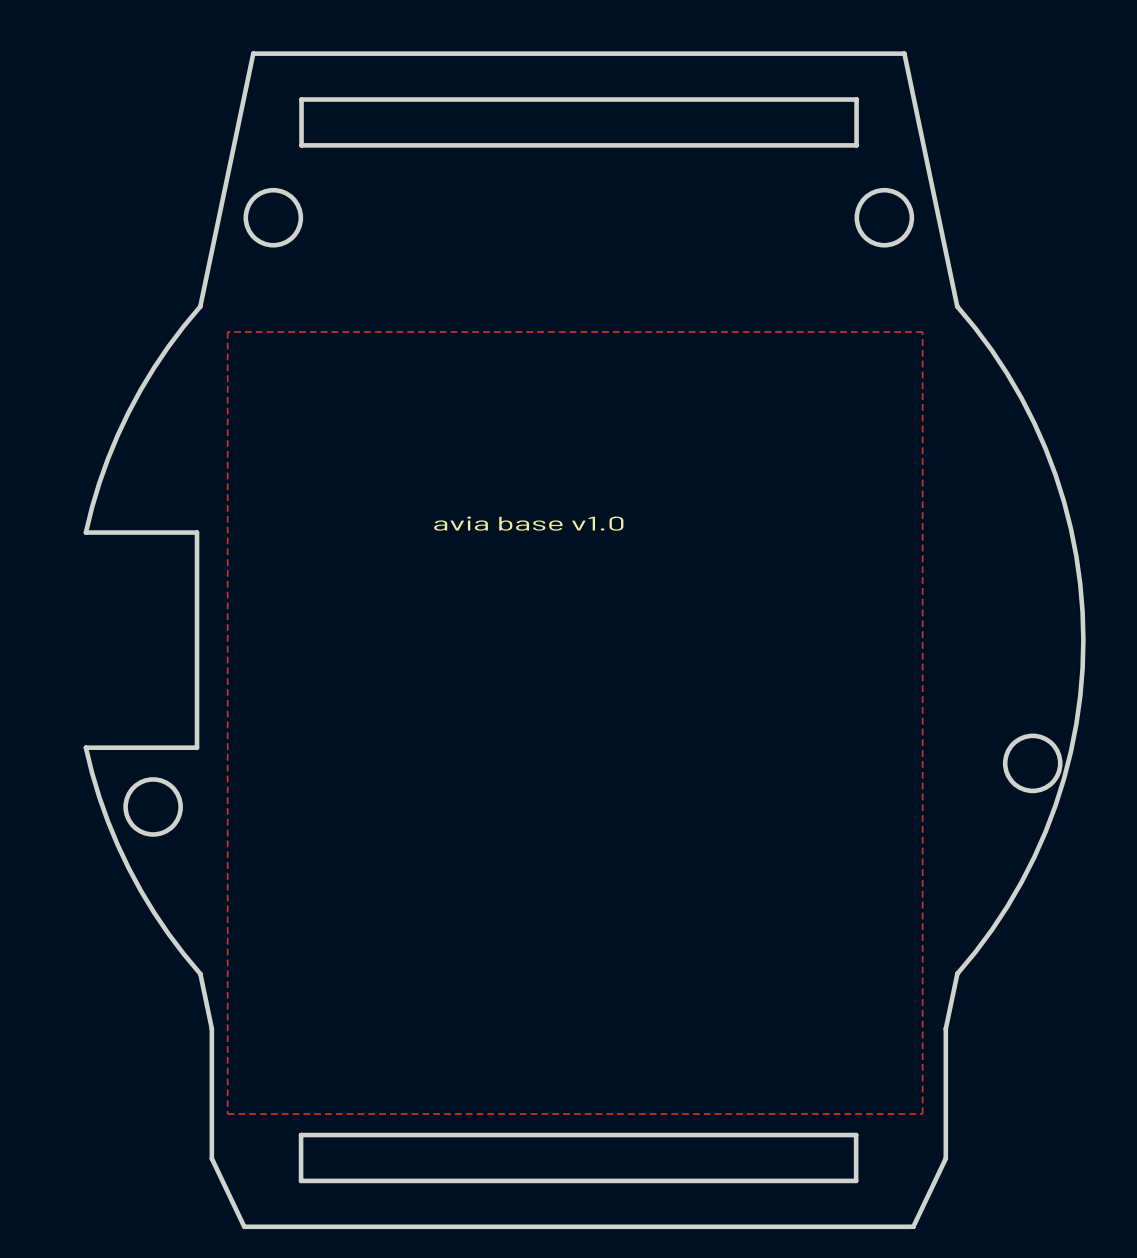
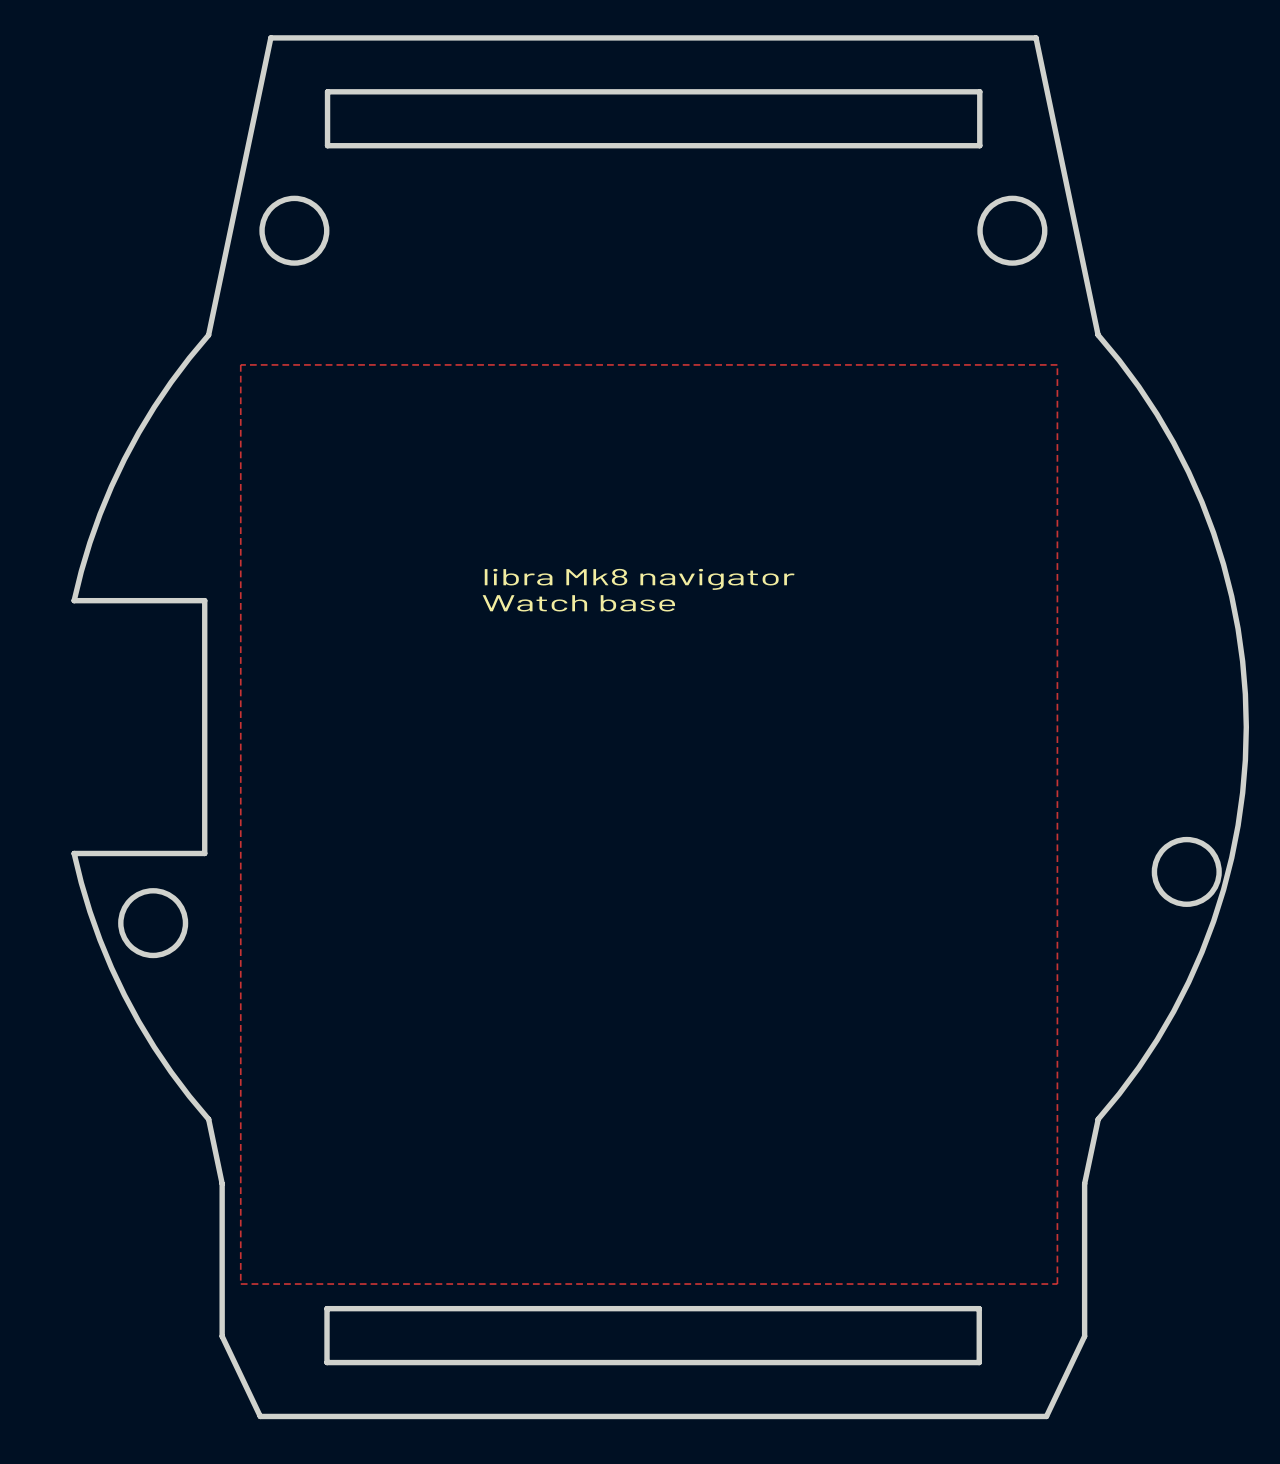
text: none -> libra Mk8 navigator (639, 579)
text: avia base v1.0 (528, 523) -> none
text: none -> Watch base (578, 603)

